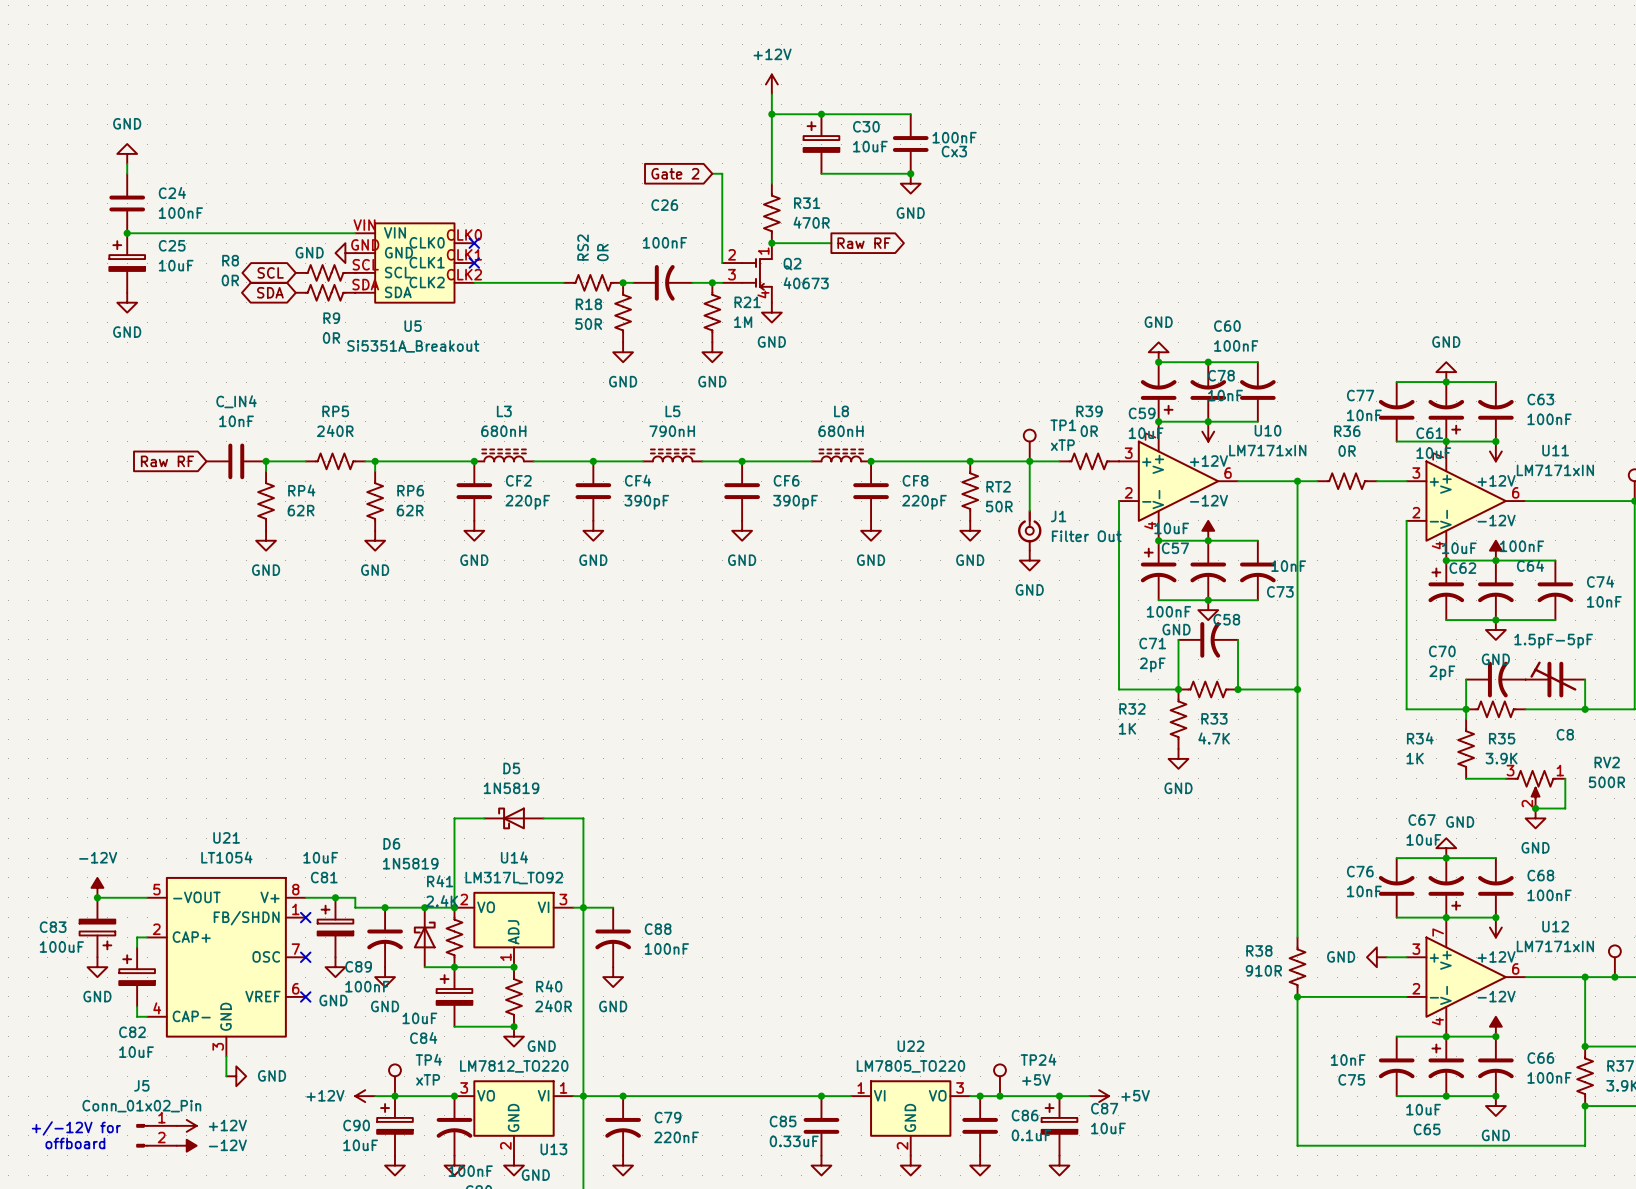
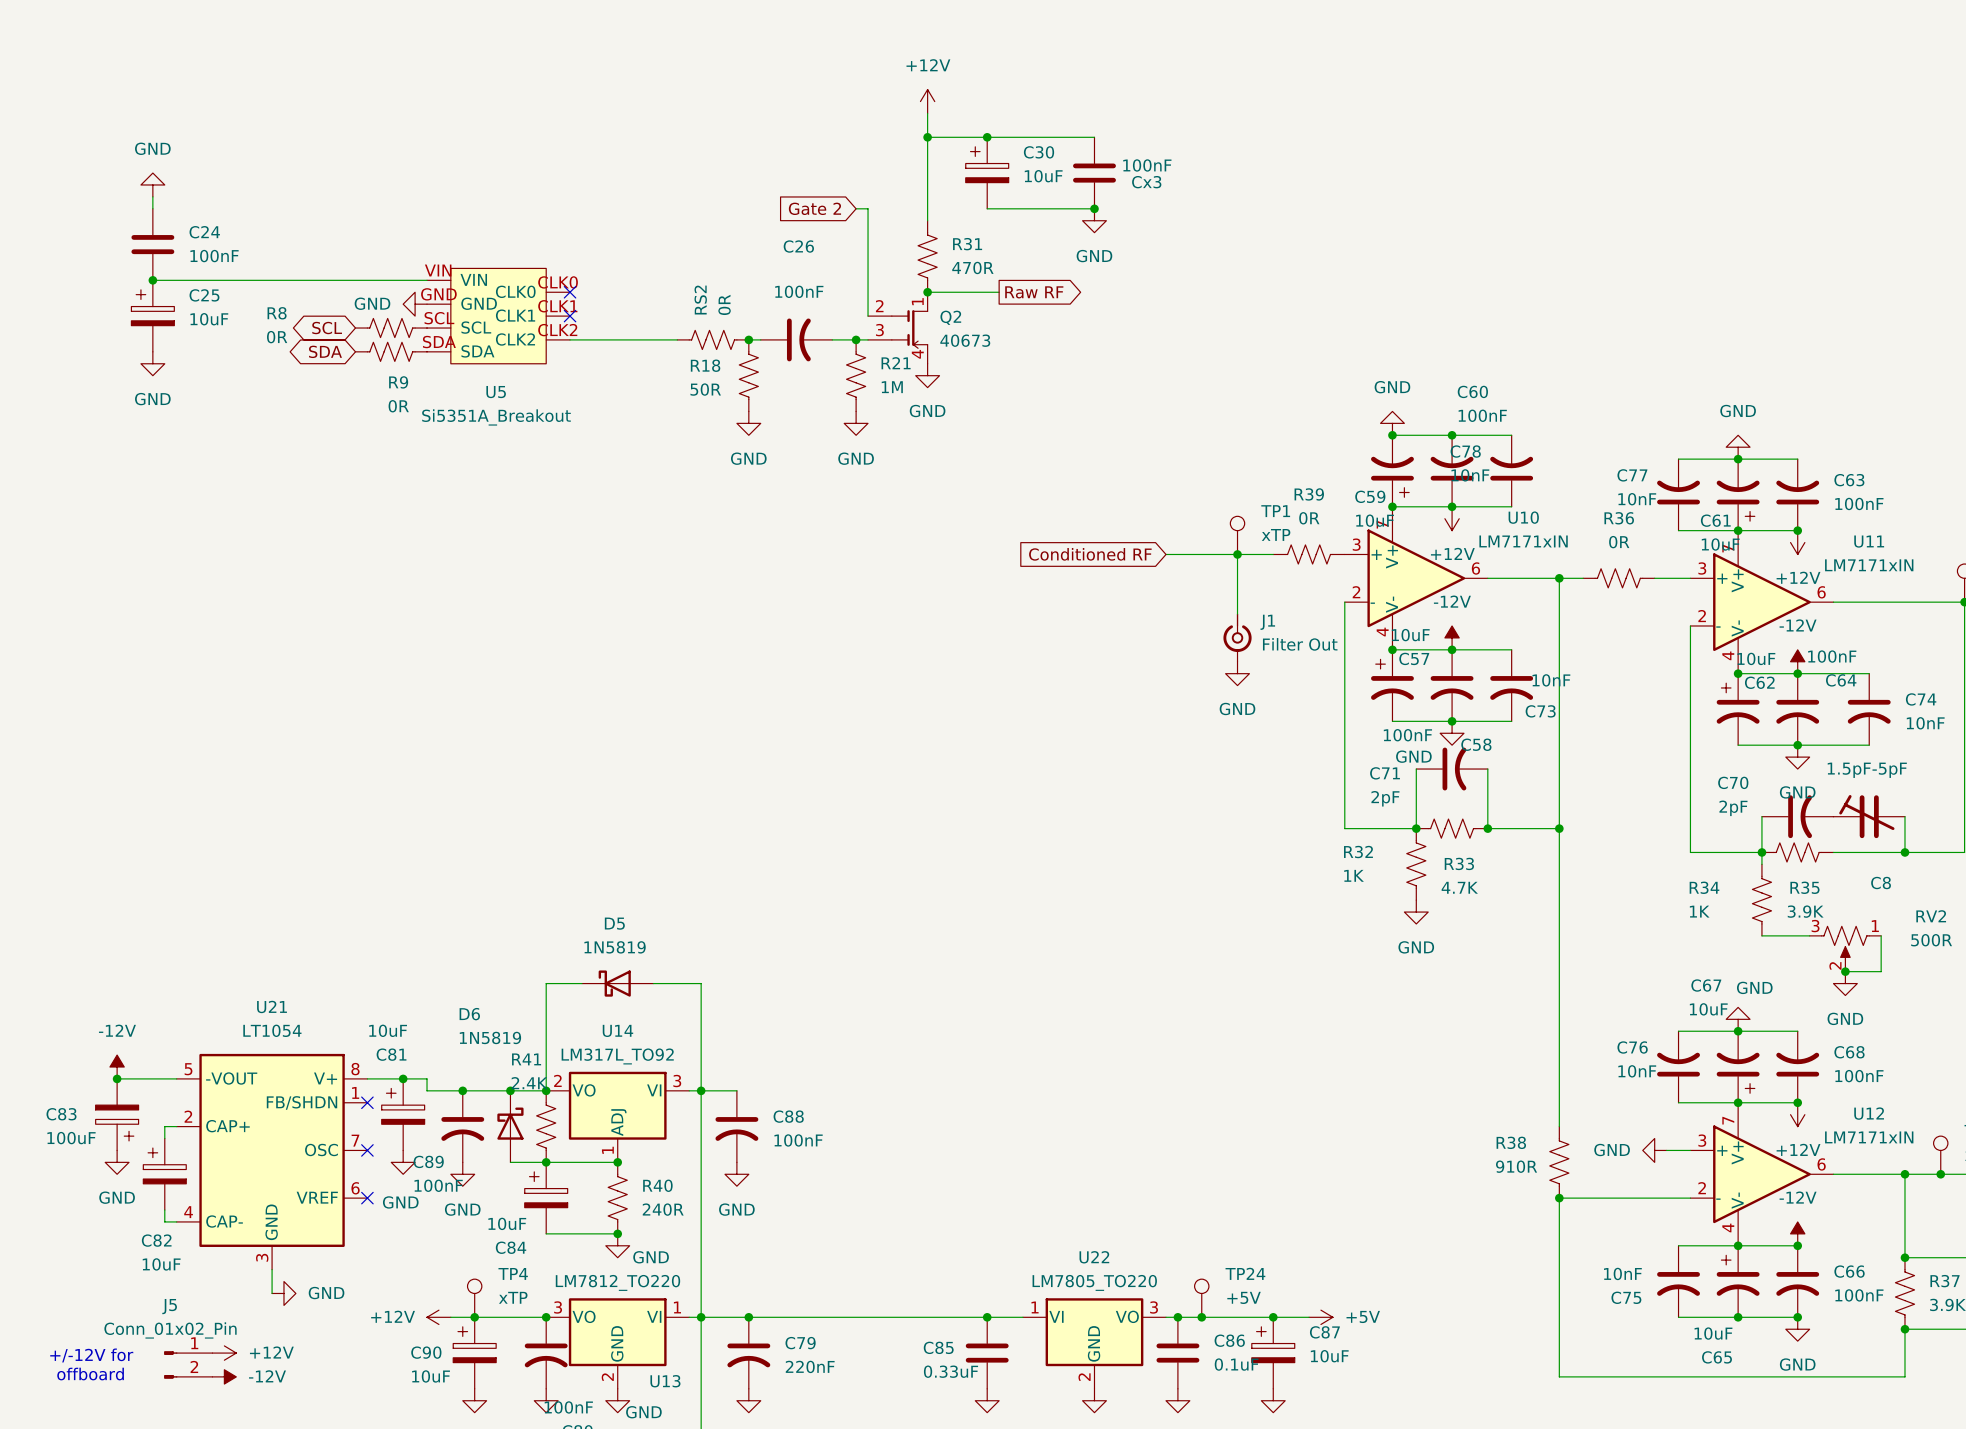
L3: 680nH (504, 455) -> none
L5: 790nH (672, 455) -> none
L8: 680nH (841, 455) -> none
global label: Raw RF (167, 461) -> none
C_IN4: 10nF (236, 461) -> none
junction: (266, 461) -> none
wire: (305, 461) (266, 461) (266, 471) -> none
RP5: 240R (335, 461) -> none
wire: (365, 461) (474, 461) -> none
wire: (375, 461) (375, 471) -> none
junction: (375, 461) -> none
junction: (474, 461) -> none
wire: (533, 461) (642, 461) -> none
junction: (593, 461) -> none
wire: (702, 461) (811, 461) -> none
junction: (742, 461) -> none
wire: (871, 461) (970, 461) -> none
junction: (871, 461) -> none
global label: none -> Conditioned RF (1090, 554)
junction: (970, 461) -> none
CF2: 220pF (474, 491) -> none
CF4: 390pF (593, 491) -> none
CF6: 390pF (742, 491) -> none
CF8: 220pF (871, 491) -> none
RT2: 50R (970, 491) -> none
RP4: 62R (266, 501) -> none
RP6: 62R (375, 501) -> none
power symbol: GND (474, 530) -> none
power symbol: GND (593, 530) -> none
power symbol: GND (742, 530) -> none
power symbol: GND (871, 530) -> none
power symbol: GND (970, 530) -> none
power symbol: GND (266, 540) -> none
power symbol: GND (375, 540) -> none

